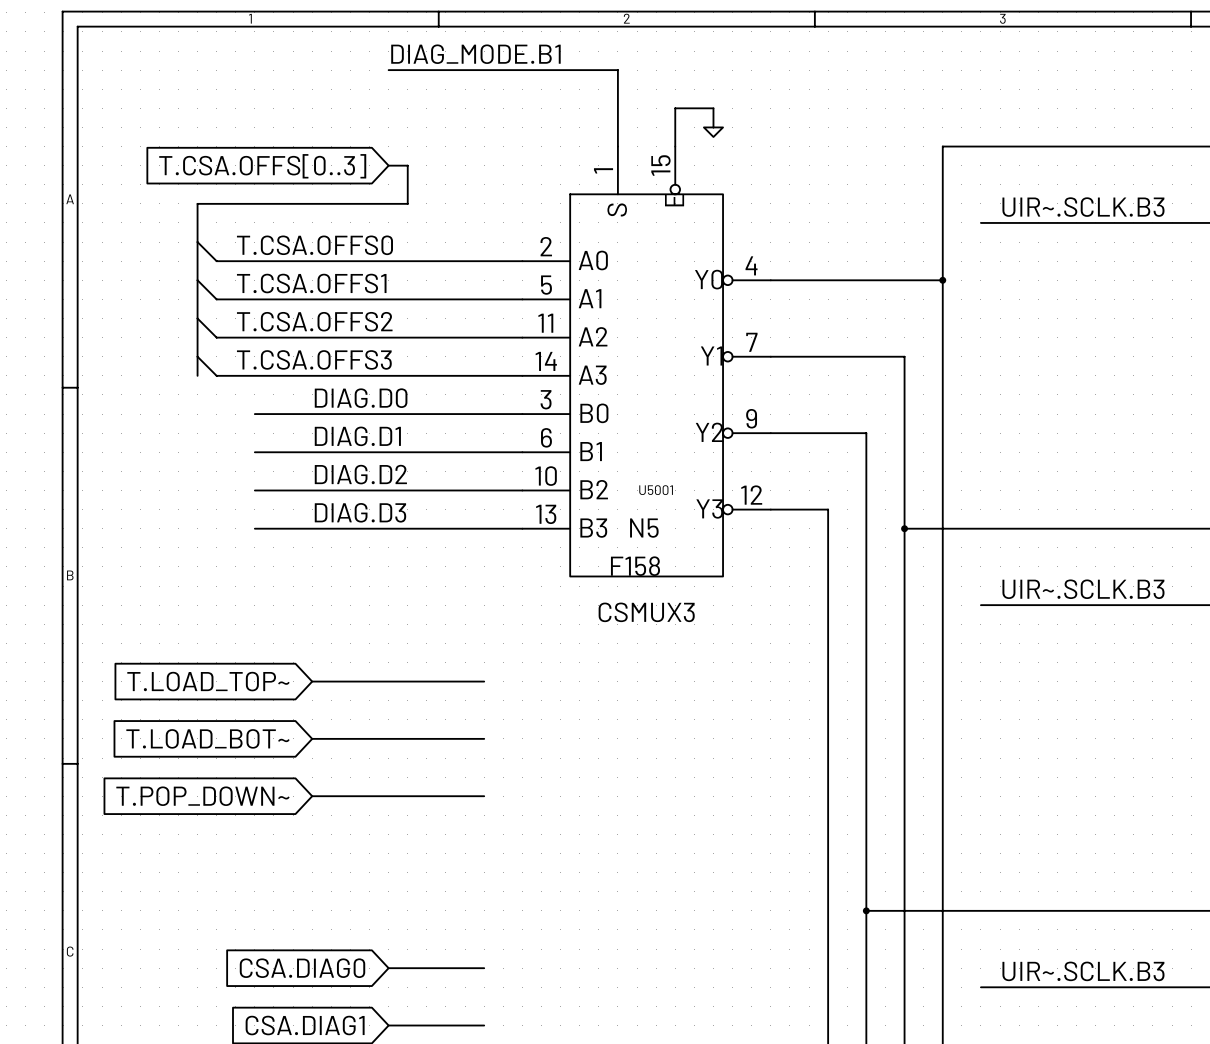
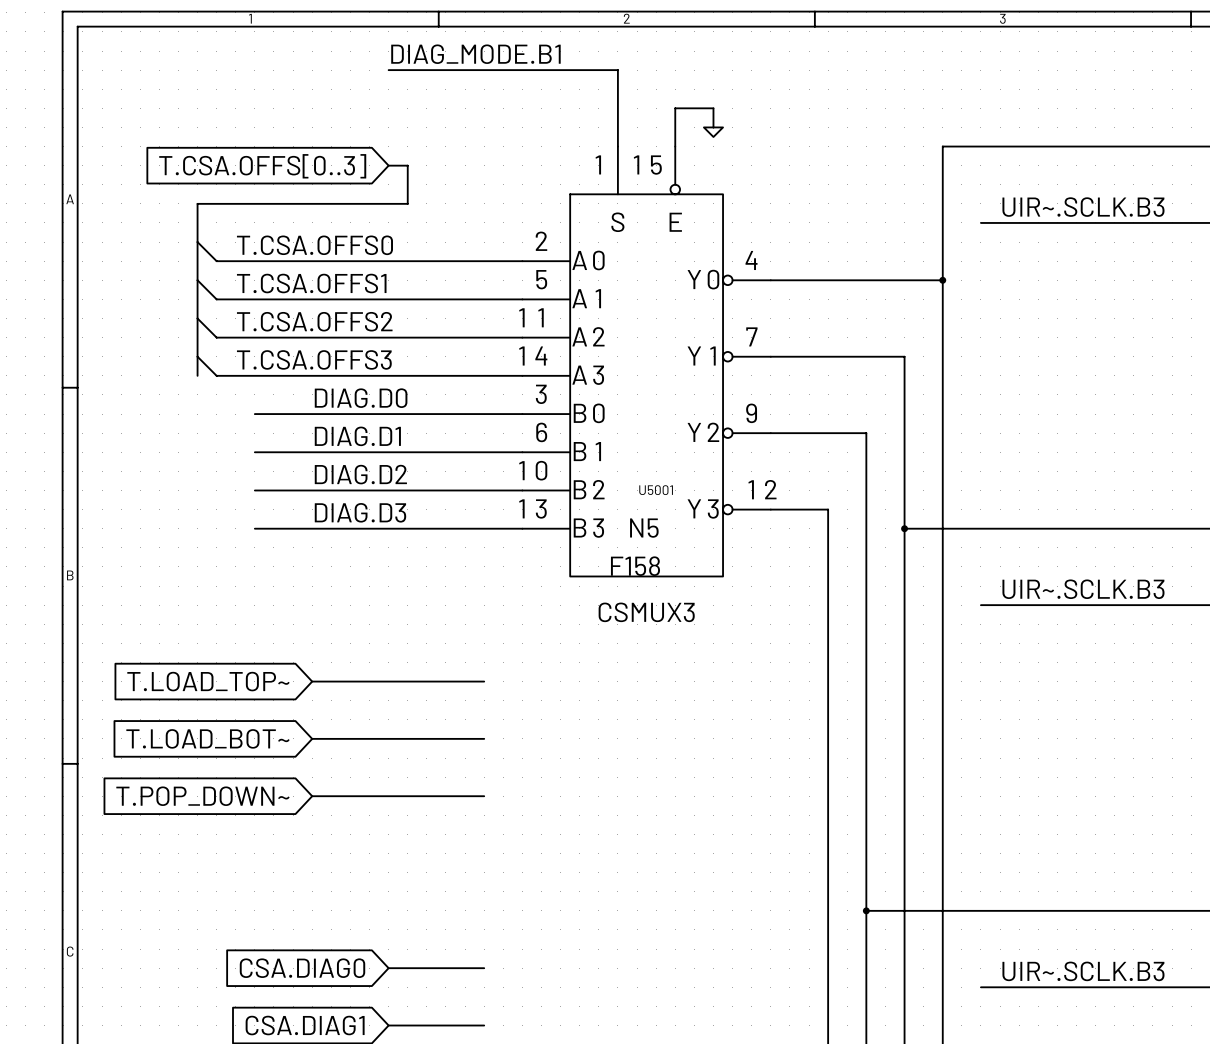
U5001 symbol: [522, 146, 771, 577] -> [522, 146, 771, 577]

